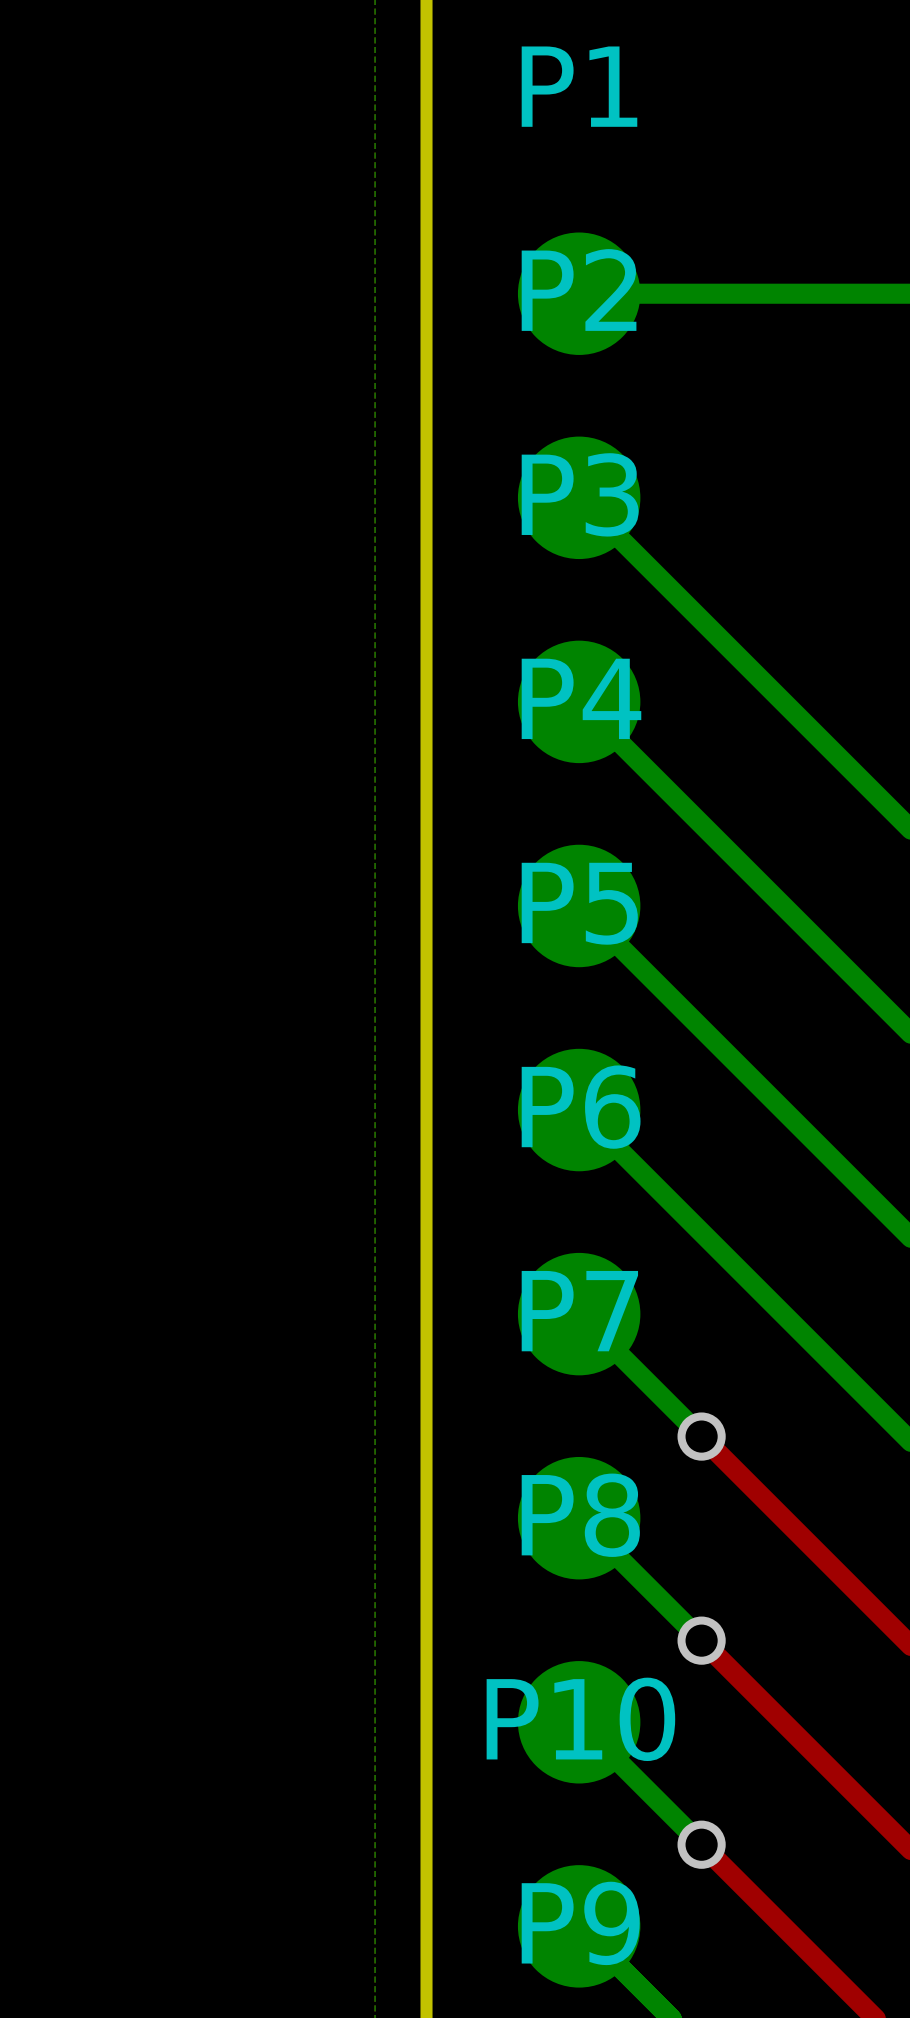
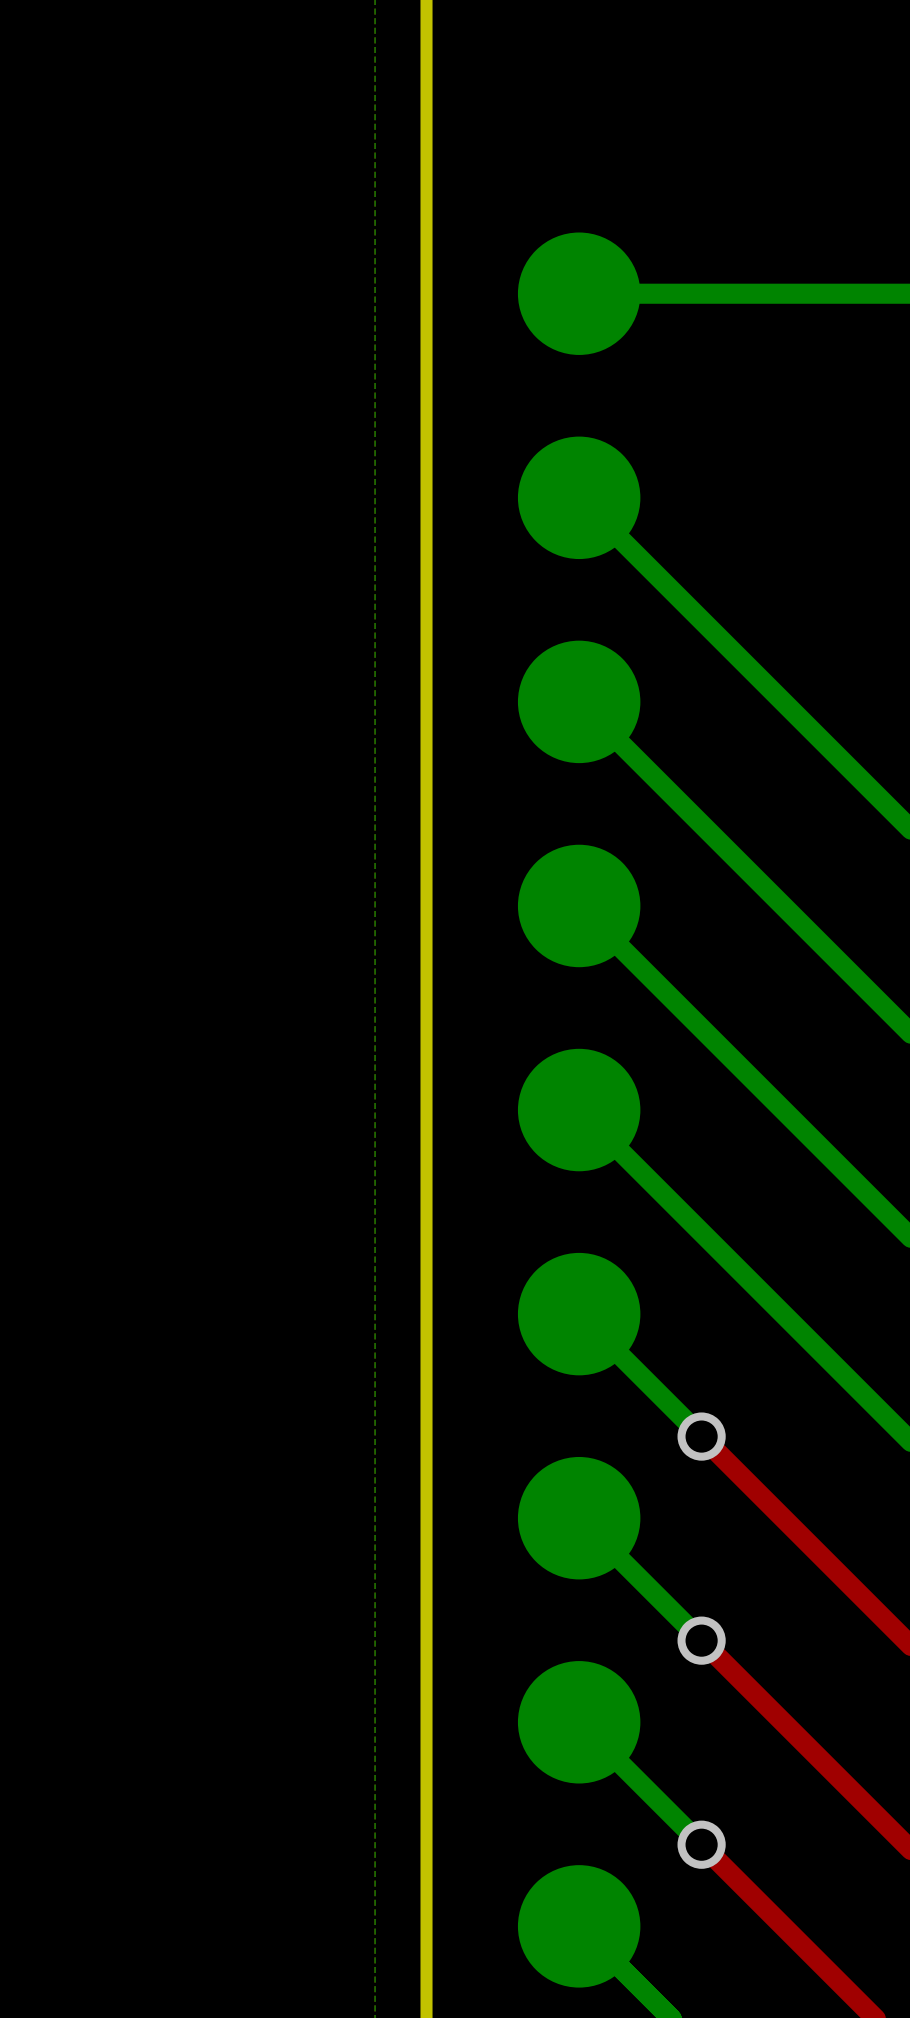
P1 name: P1 (579, 86) -> none
P2 name: P2 (579, 290) -> none
P3 name: P3 (580, 494) -> none
P4 name: P4 (581, 698) -> none
P5 name: P5 (579, 903) -> none
P6 name: P6 (581, 1107) -> none
P7 name: P7 (579, 1311) -> none
P8 name: P8 (580, 1515) -> none
P10 name: P10 (580, 1719) -> none
P9 name: P9 (580, 1923) -> none

